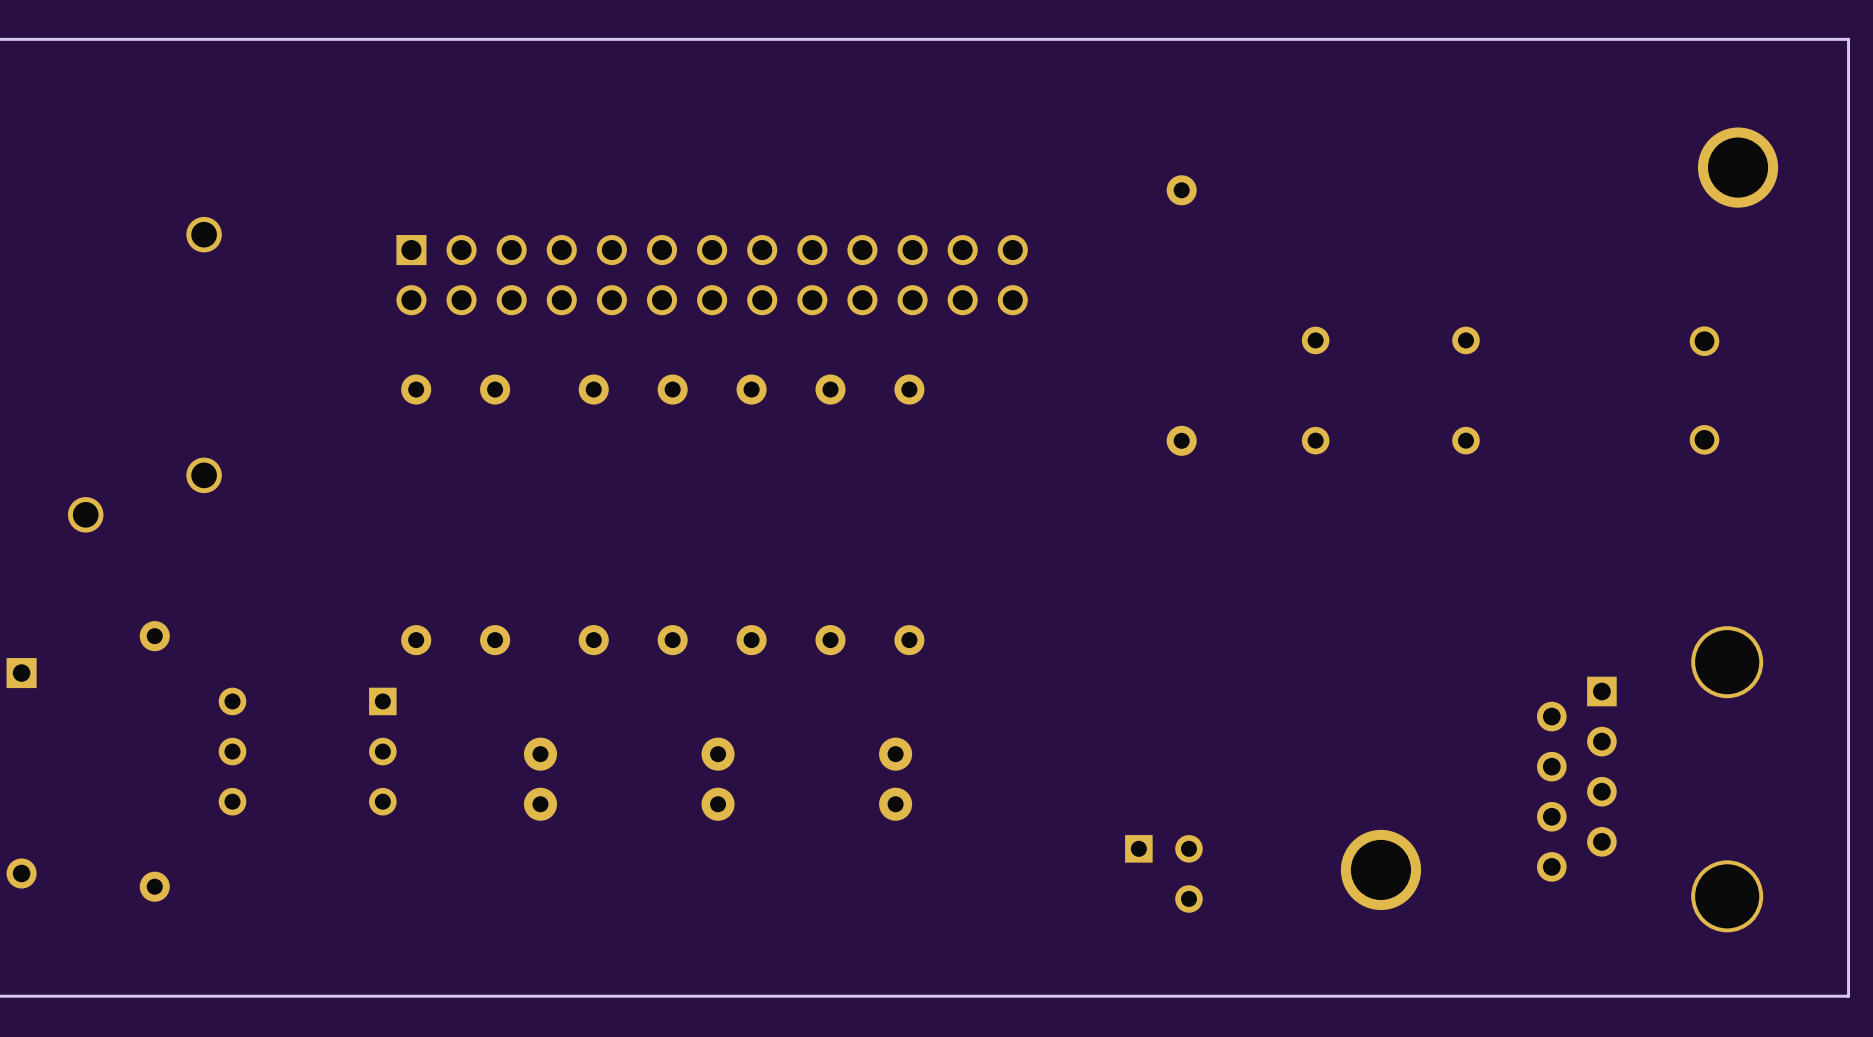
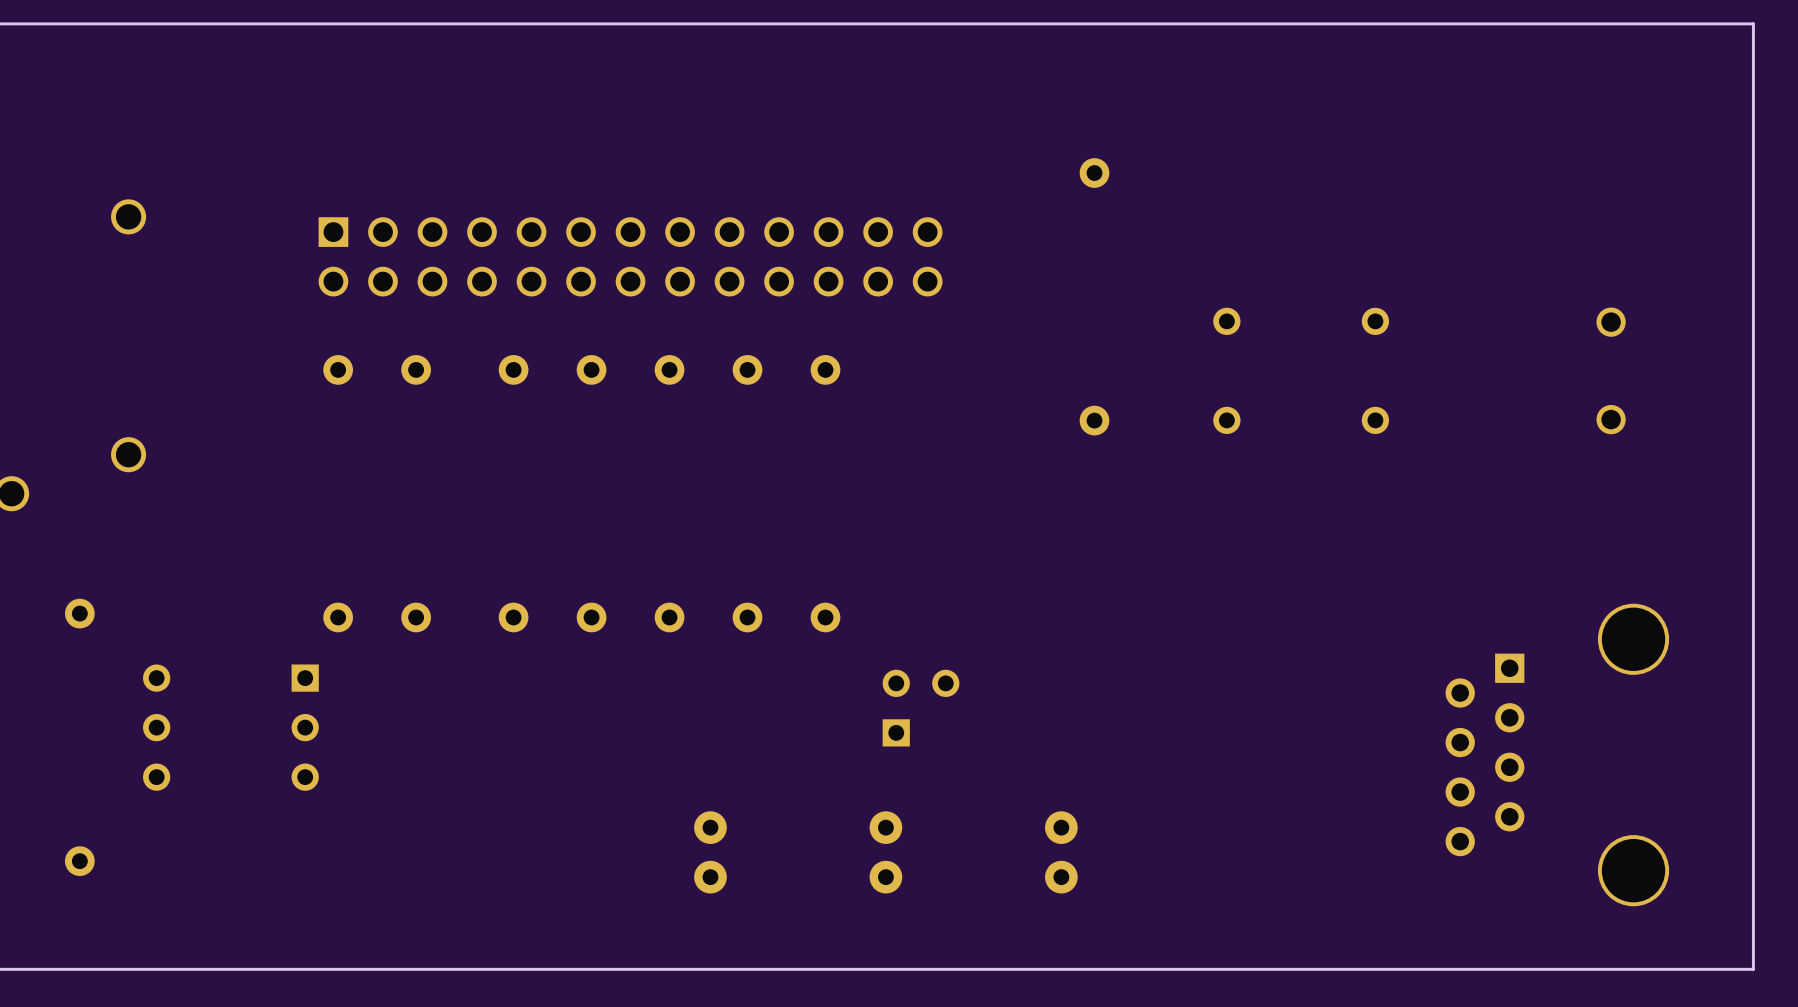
part: (1738, 167) -> none
part: none -> (921, 708)
part: (540, 779) -> none
part: (718, 779) -> none
part: (895, 779) -> none
part footprint: [1125, 835, 1203, 913] -> [1045, 811, 1078, 894]
part: (1380, 869) -> none
part: none -> (710, 852)
part: none -> (885, 852)

